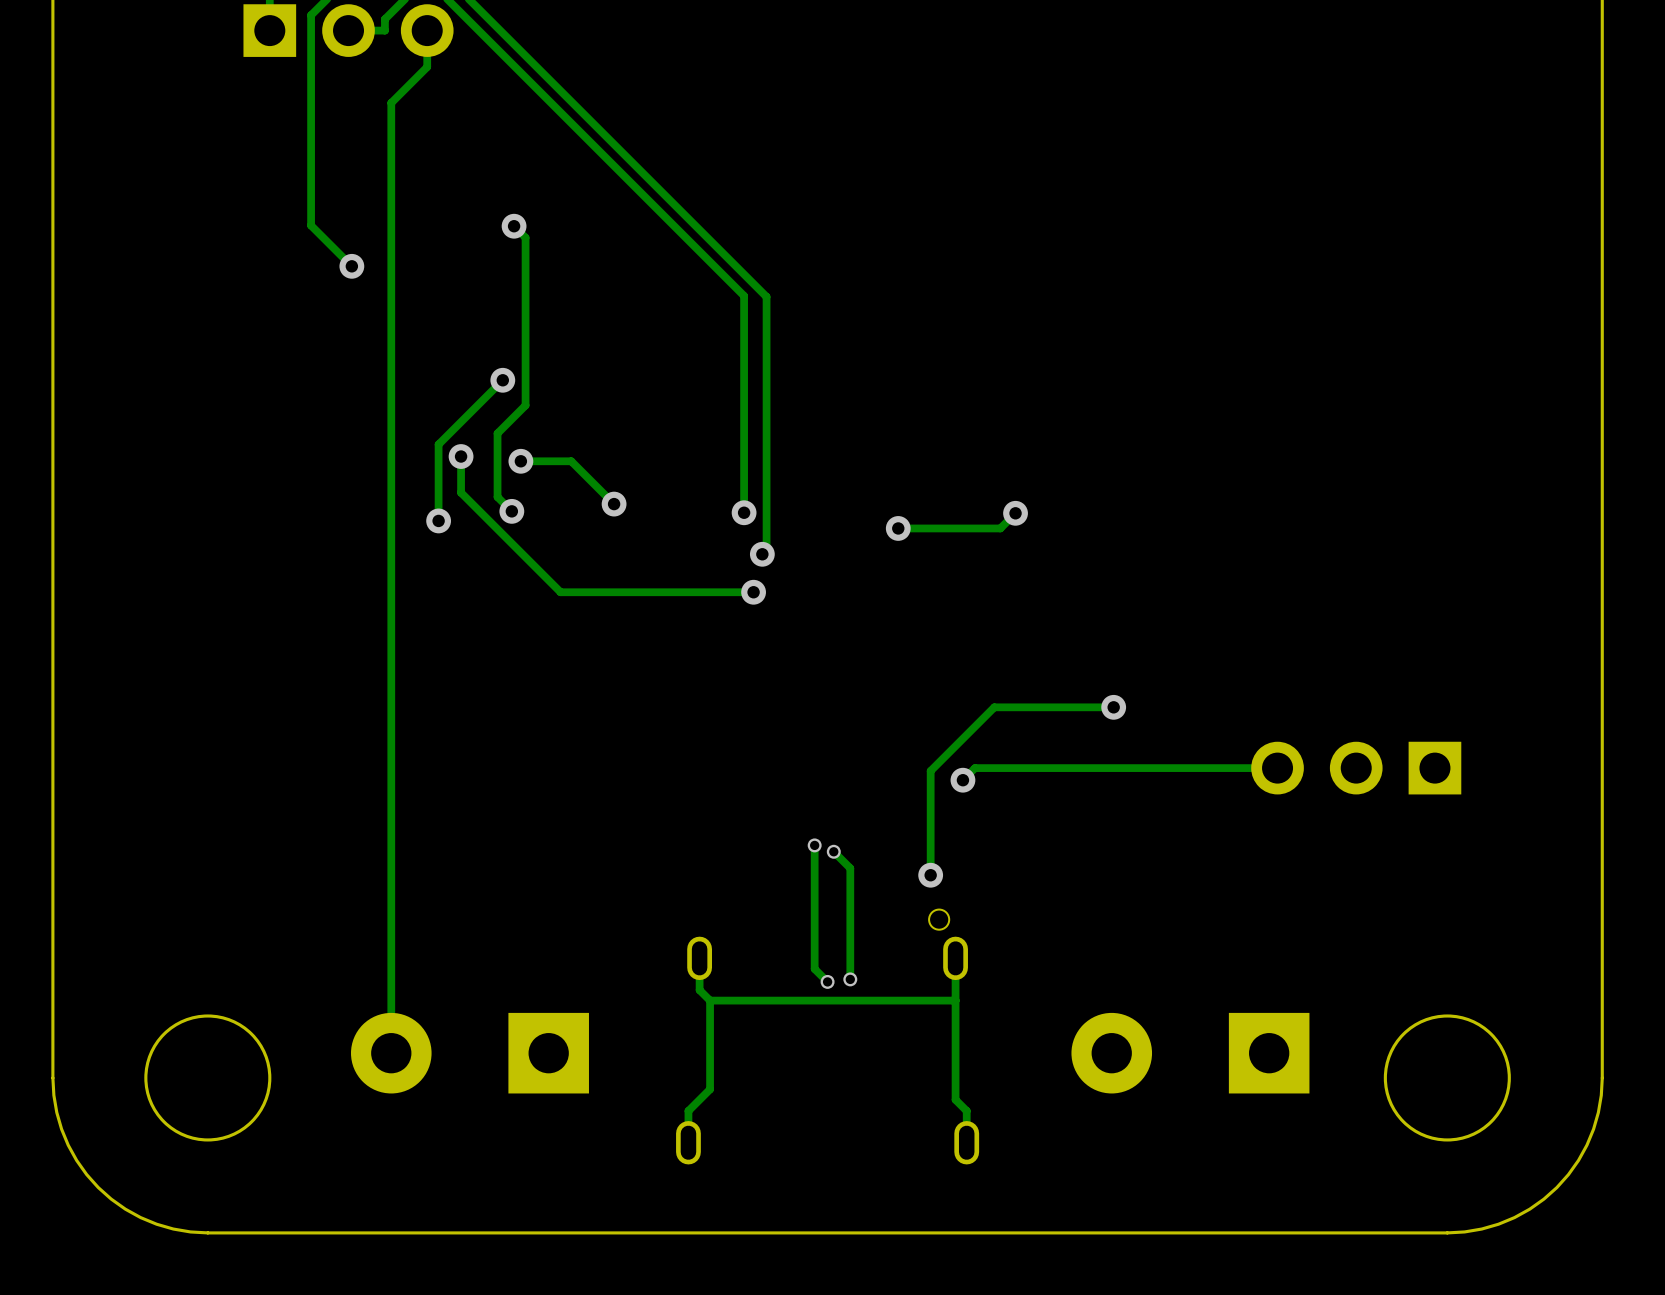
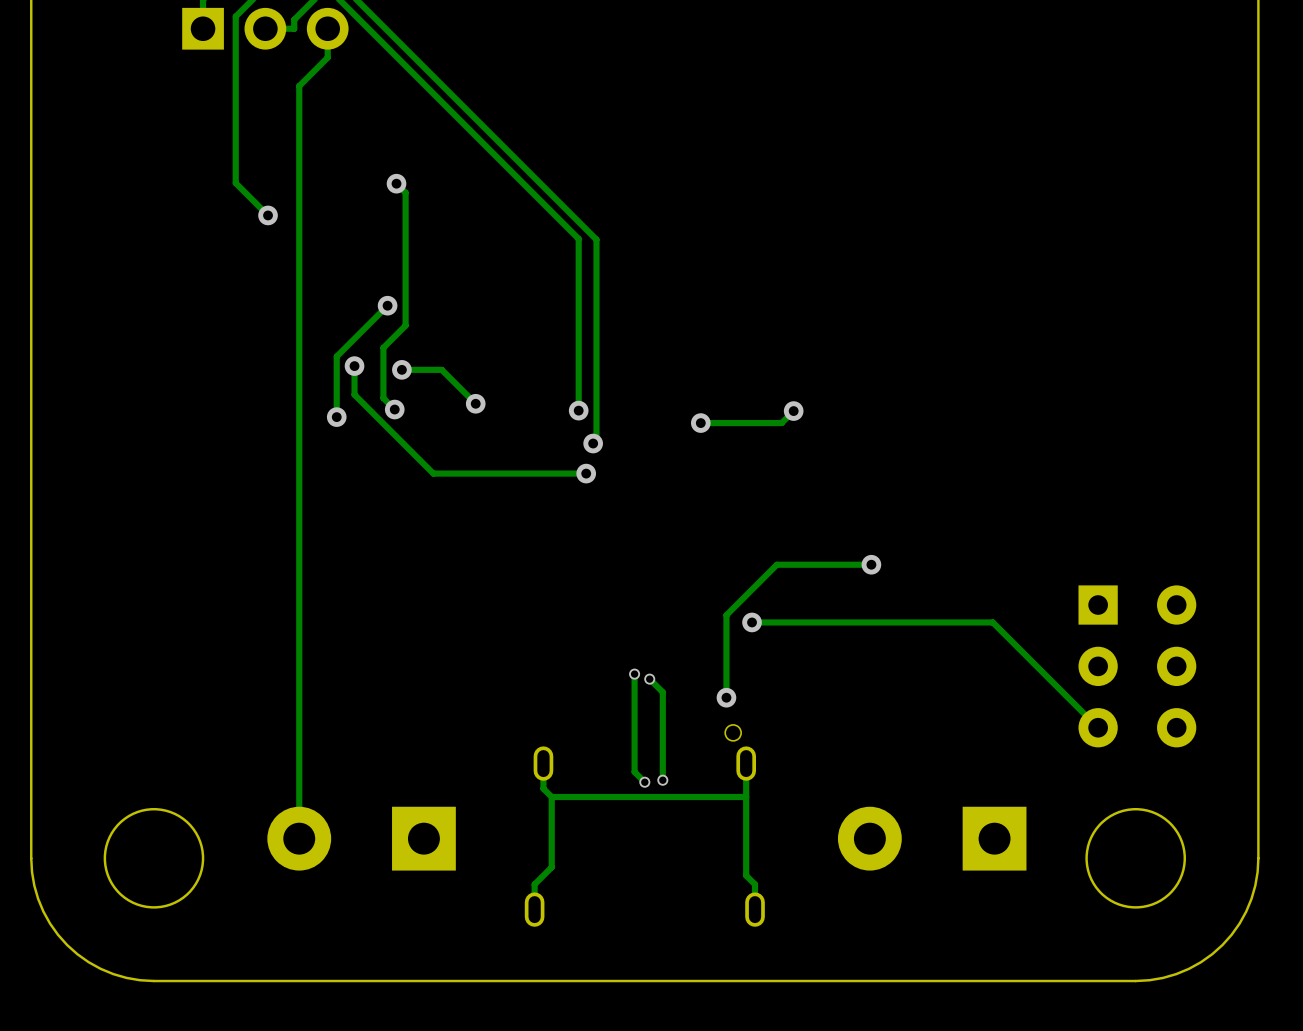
track: (1277, 768) (975, 768) (962, 780) -> (1098, 727) (992, 622) (752, 622)
part: (1356, 768) -> none
part: none -> (1137, 666)

